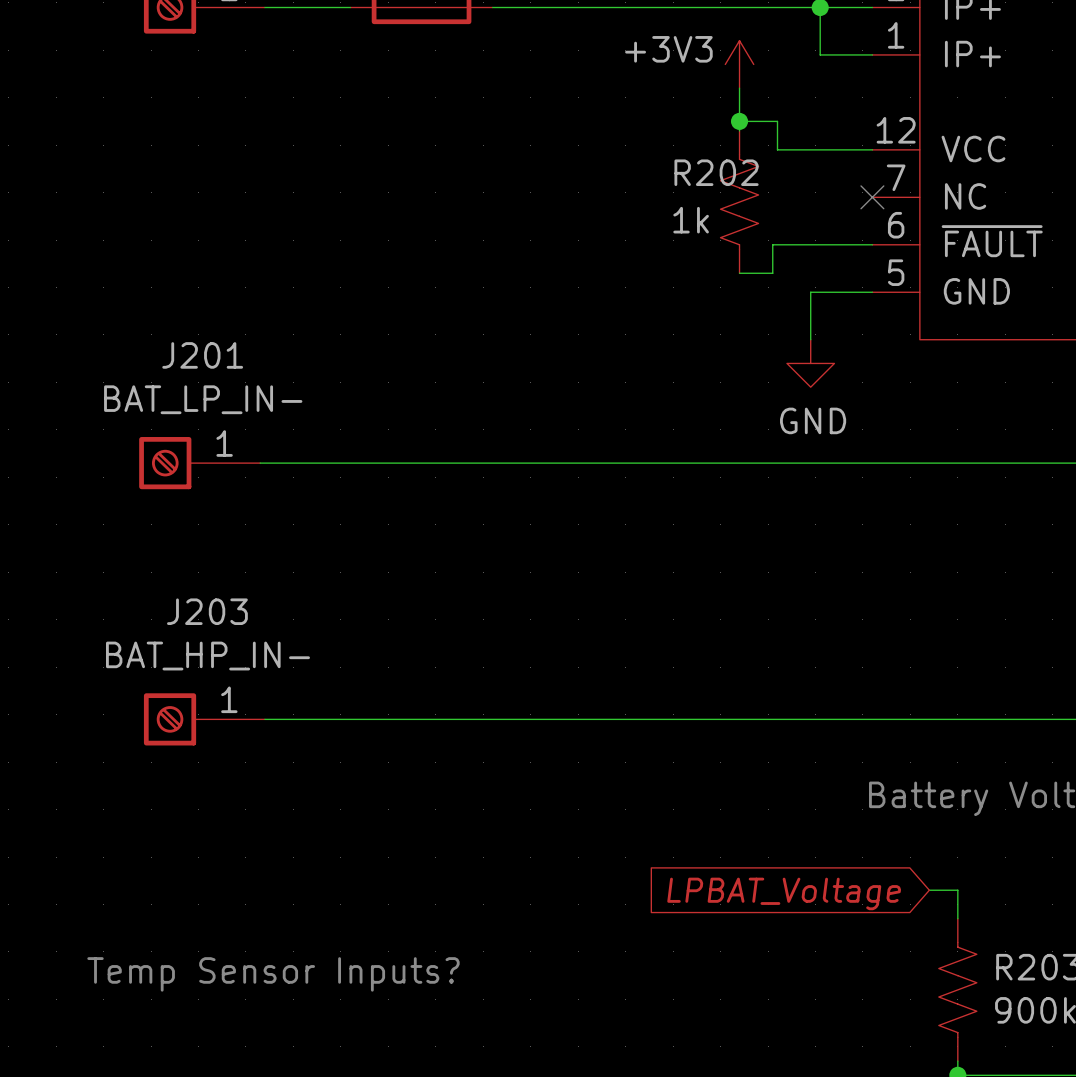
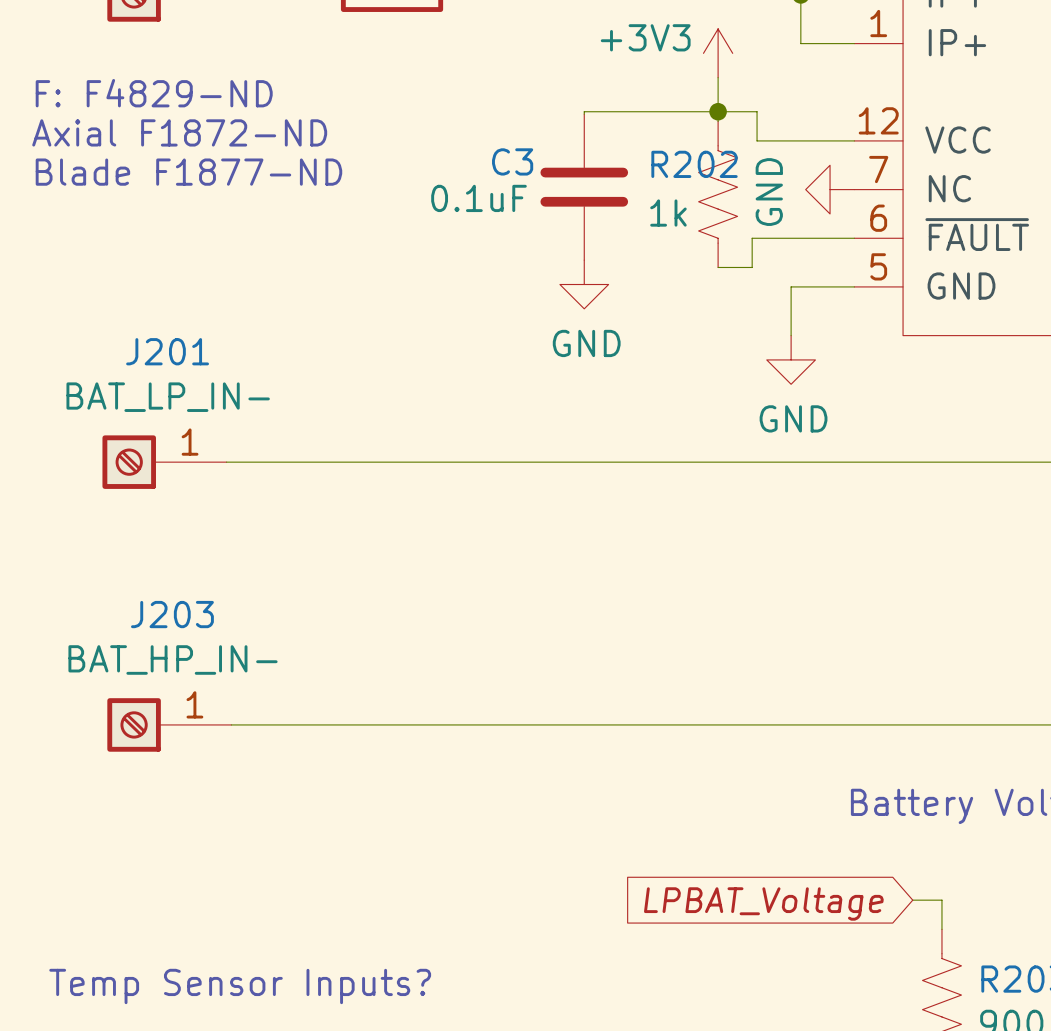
text: none -> F: F4829-ND (154, 93)
wire: none -> (718, 111) (584, 111) (584, 114)
text: none -> Axial F1872-ND (179, 132)
text: none -> Blade F1877-ND (188, 172)
C3: none -> 0.1uF (584, 187)
power symbol: none -> GND (830, 189)
no-connect mark: (872, 197) -> none
power symbol: none -> GND (584, 284)

